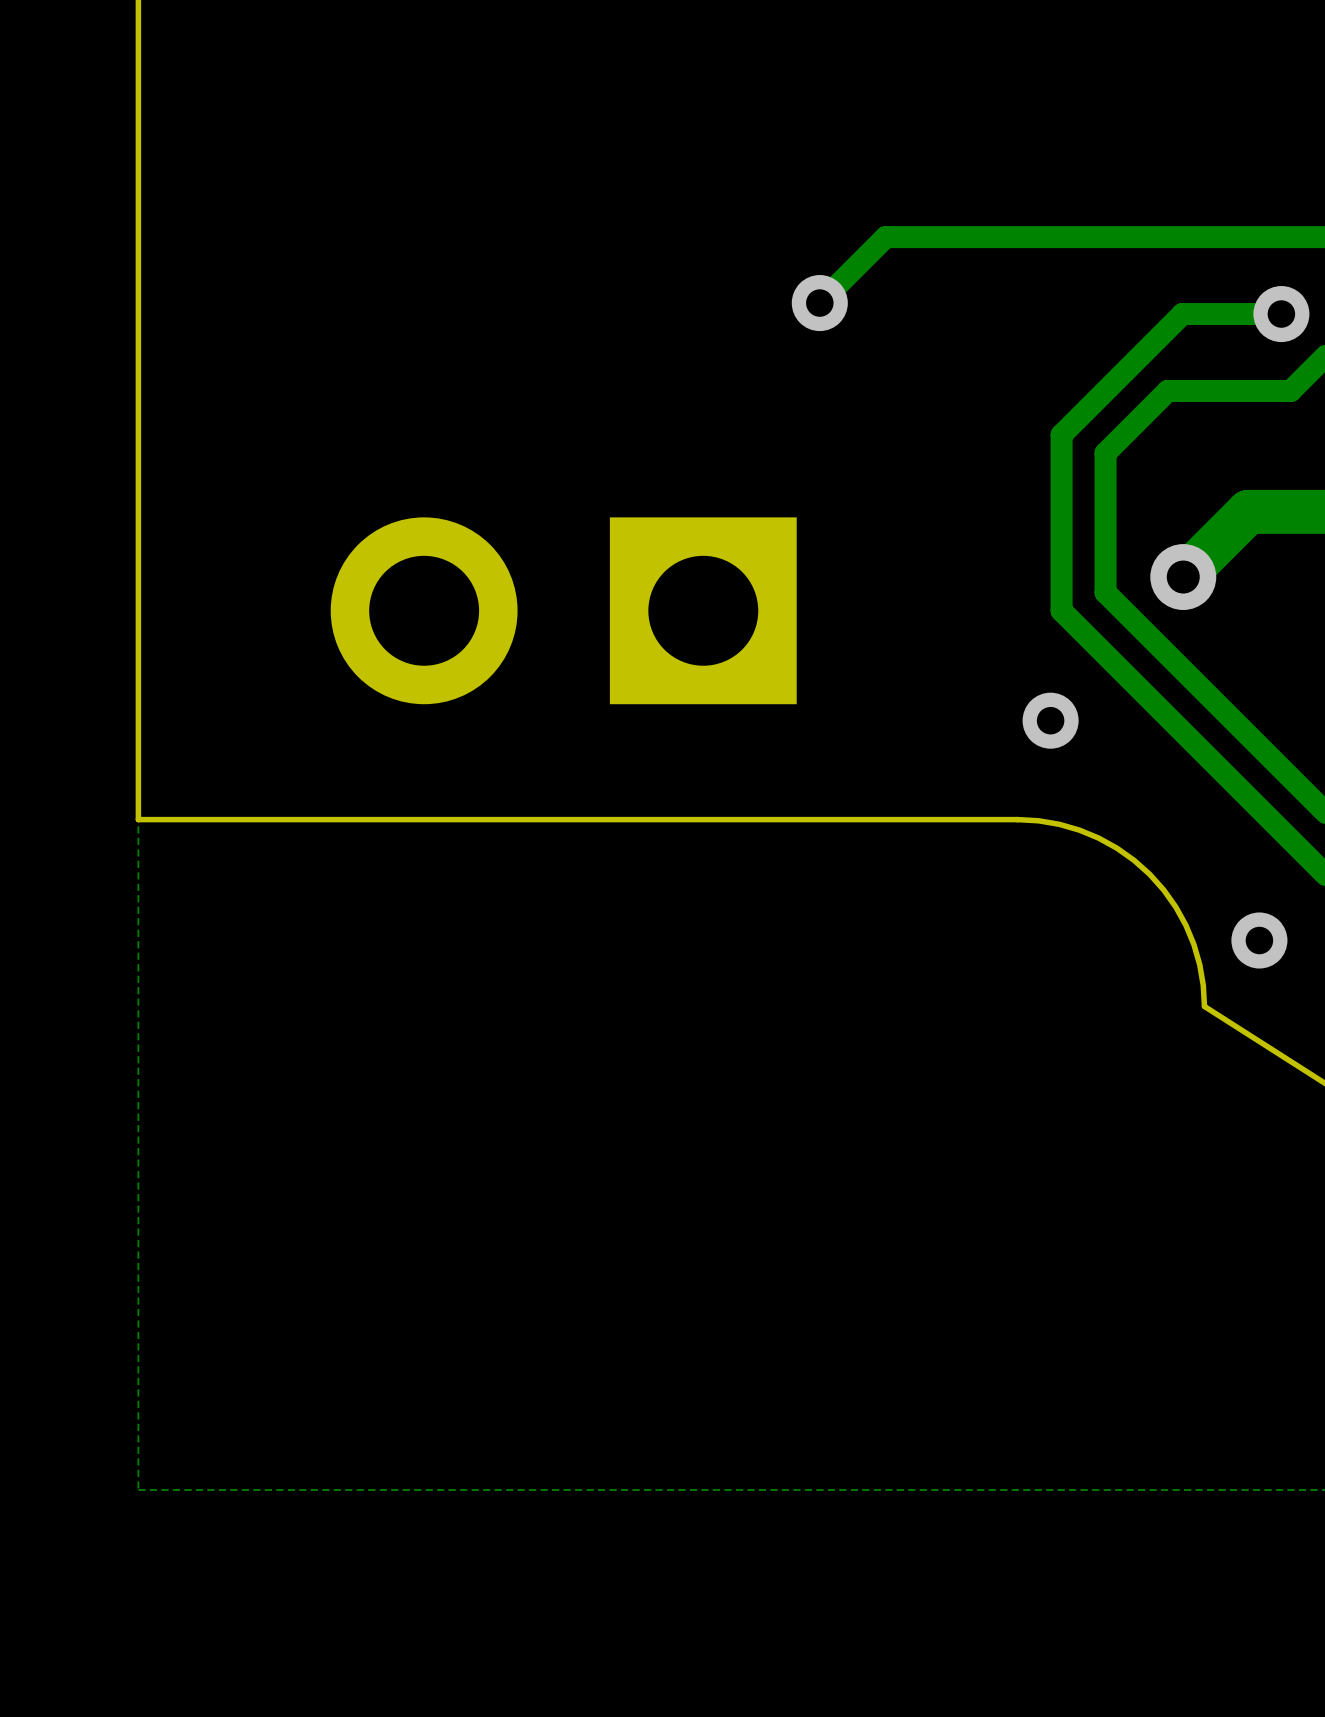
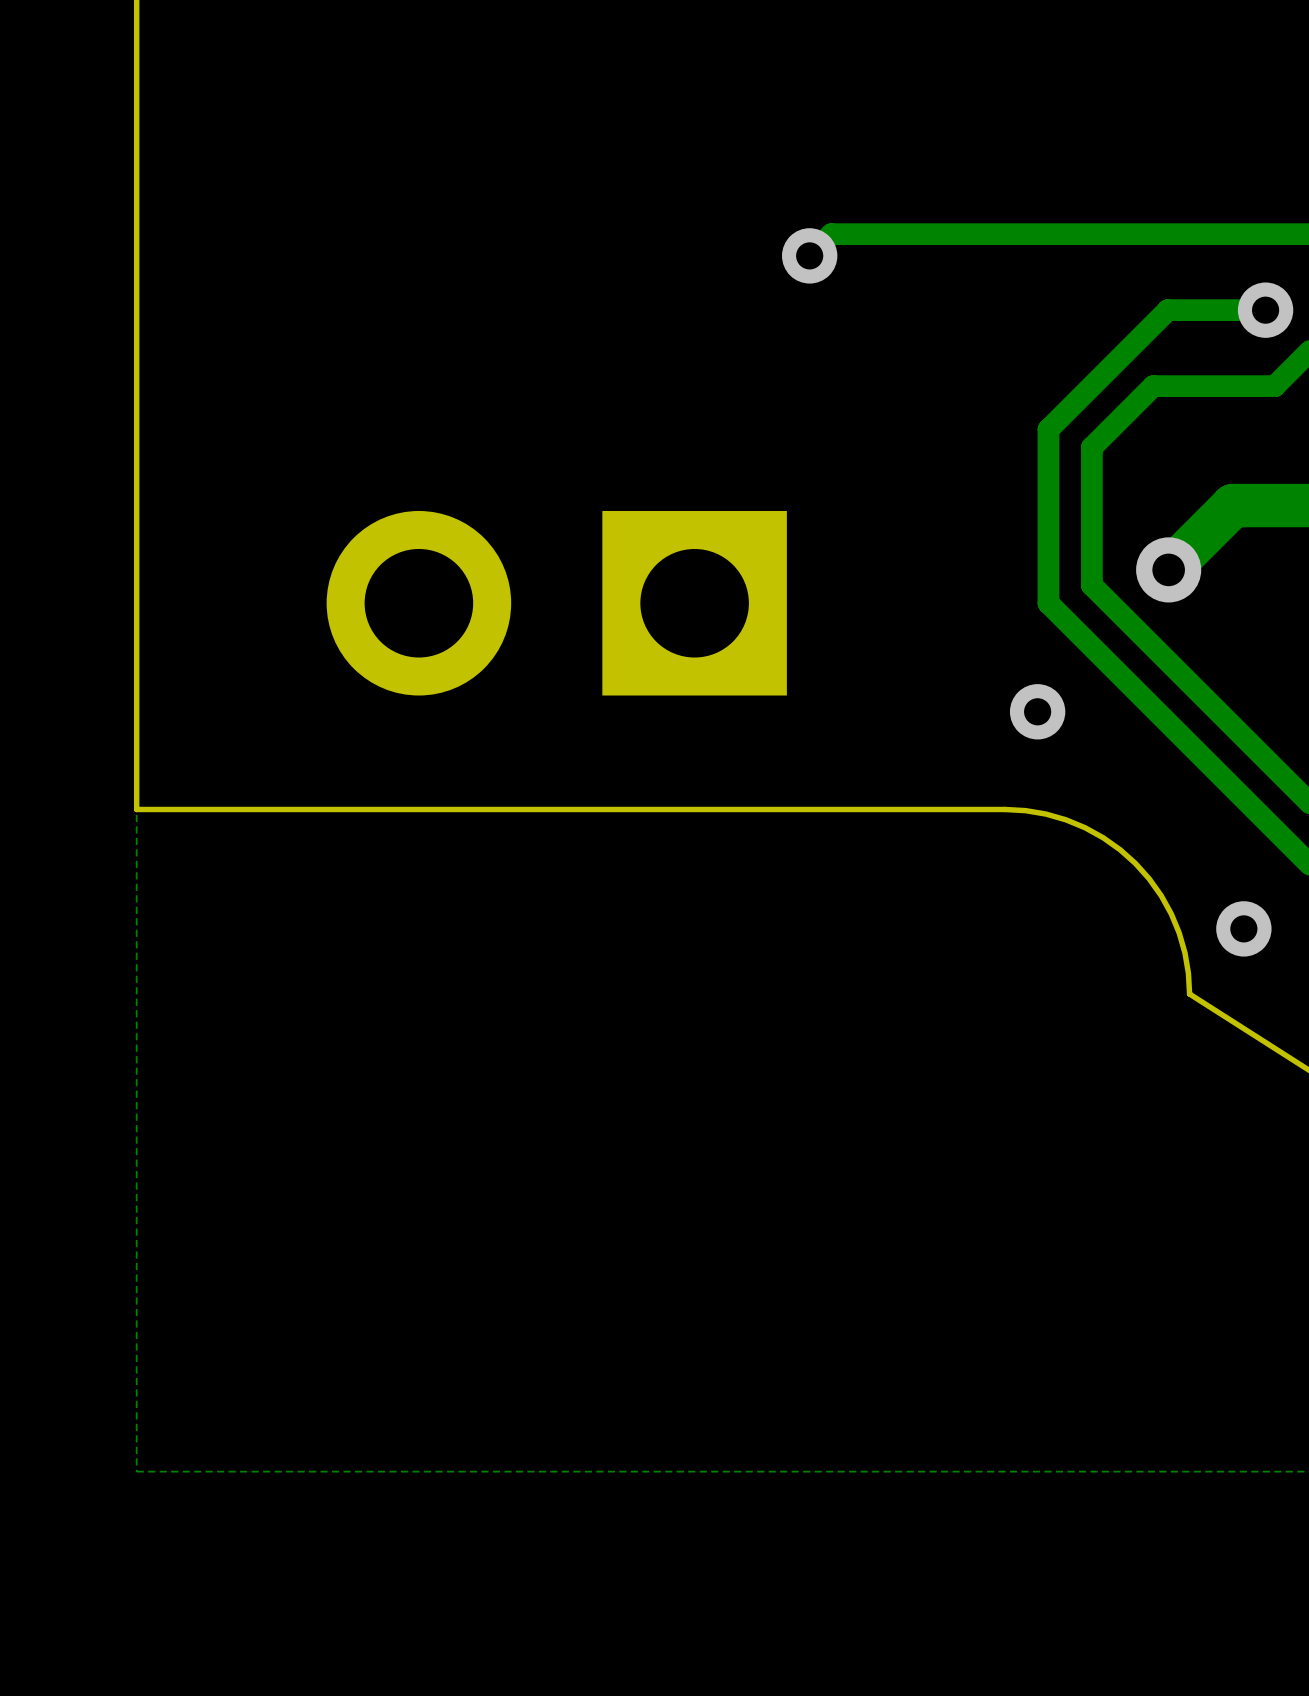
track: (885, 237) (819, 303) -> (874, 234) (831, 234) (809, 255)
via position: (819, 303) -> (809, 255)

